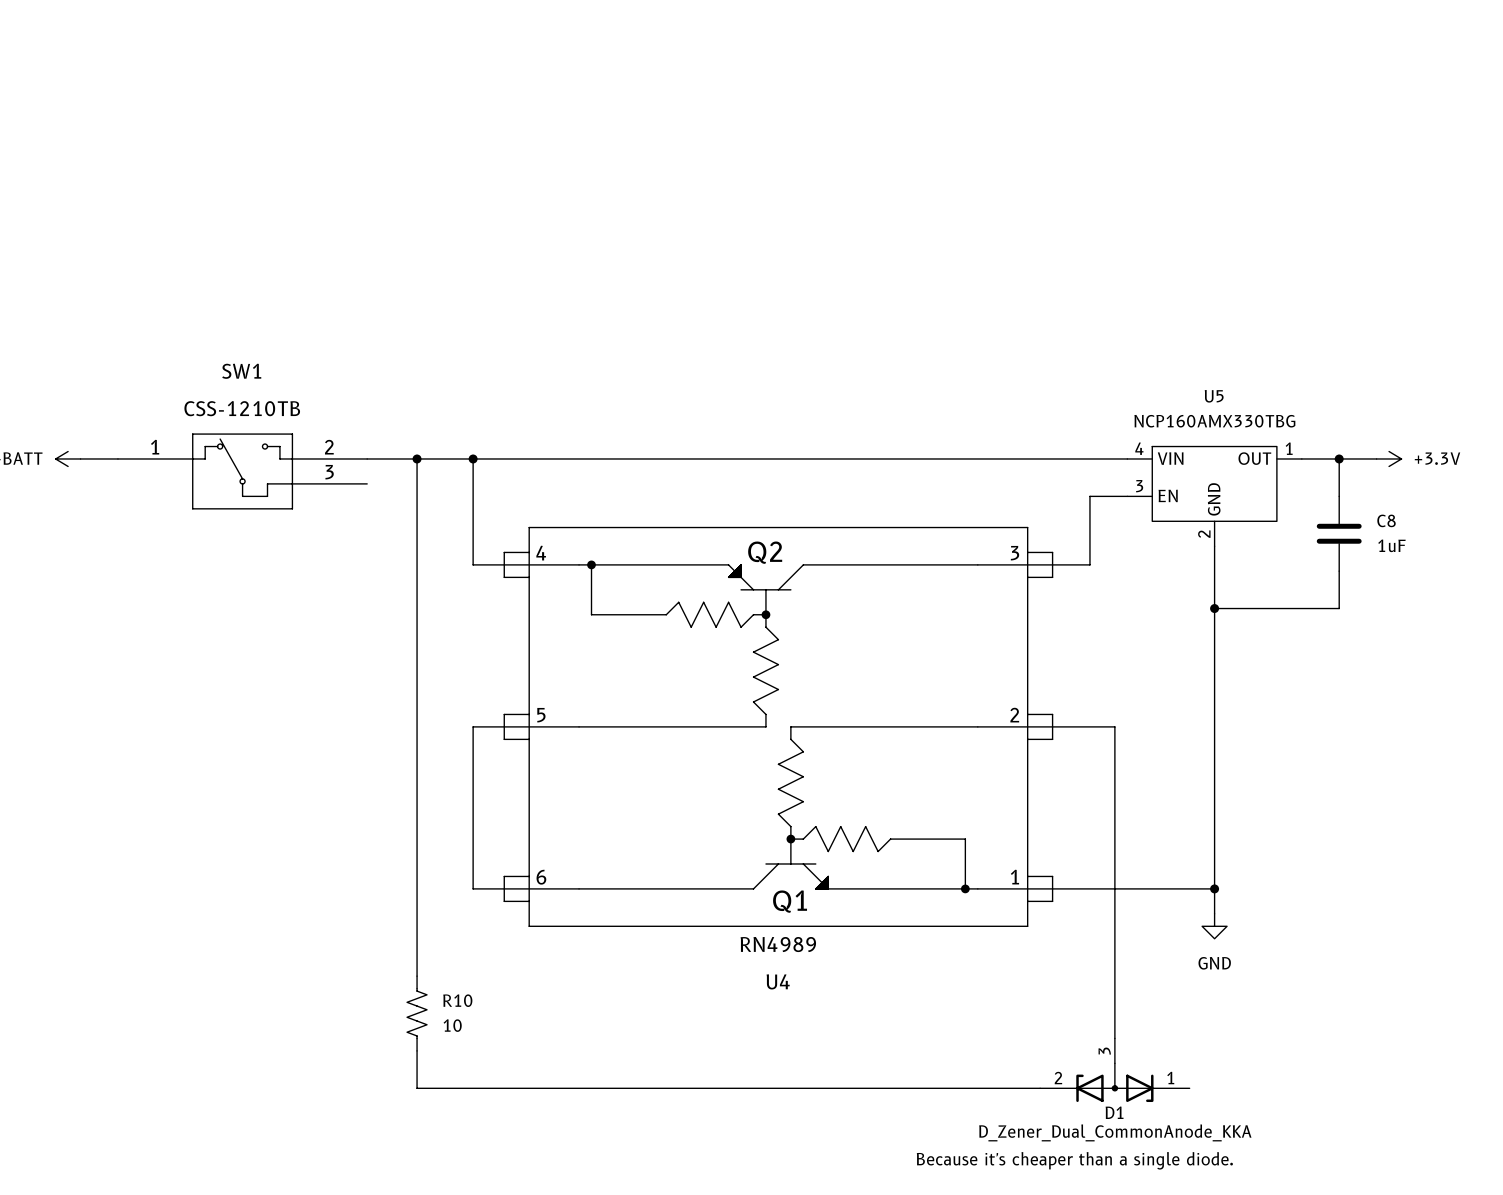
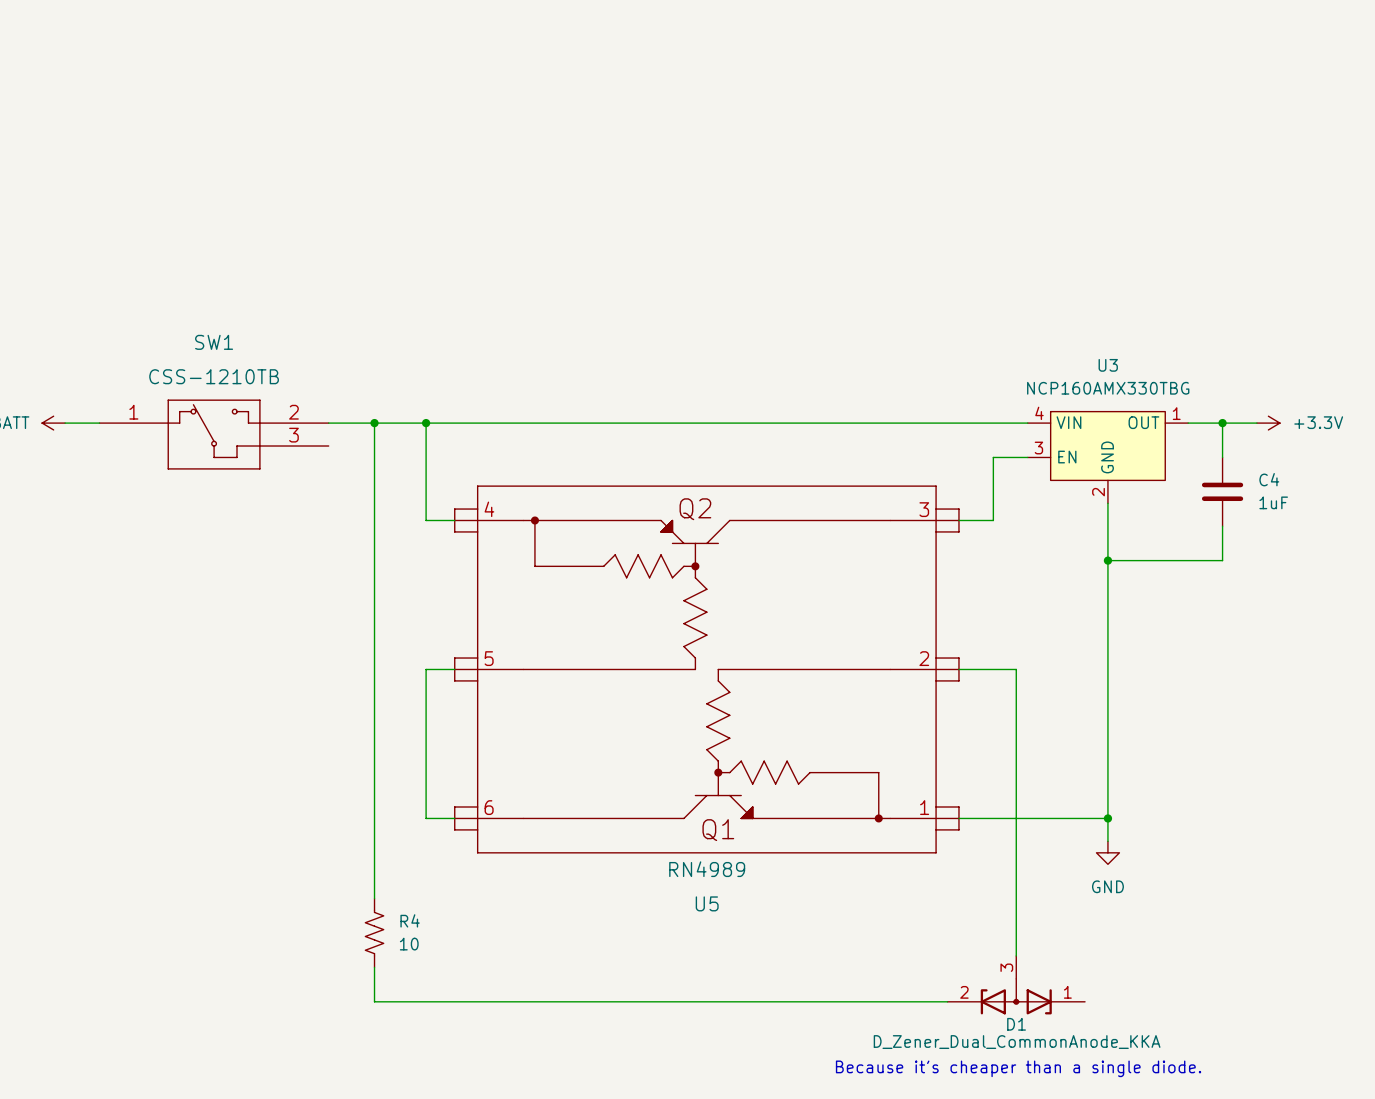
U5 name: U5 (1214, 396) -> U3 (1108, 365)
C8 name: C8 (1386, 520) -> C4 (1269, 479)
U4 name: U4 (778, 981) -> U5 (707, 903)
R10 name: R10 (457, 1000) -> R4 (410, 920)

